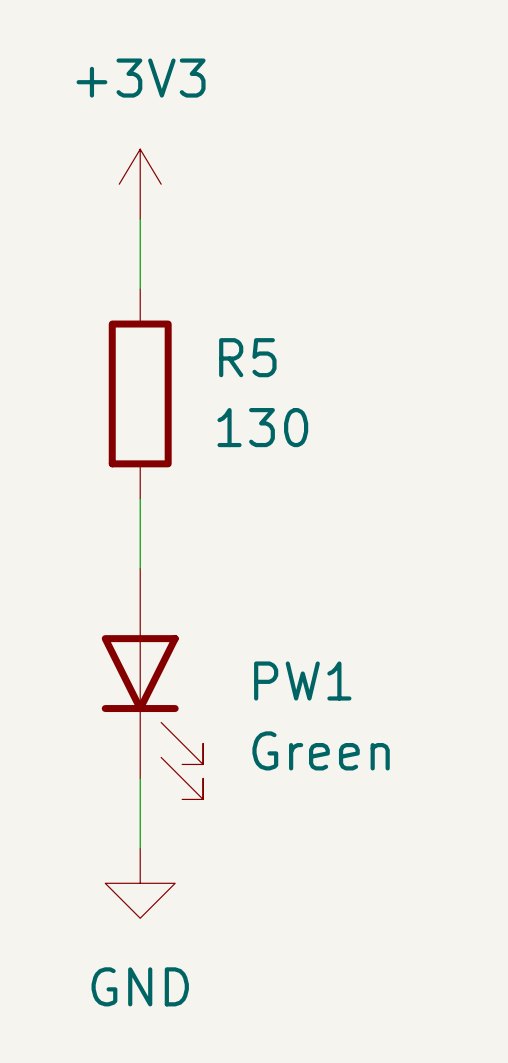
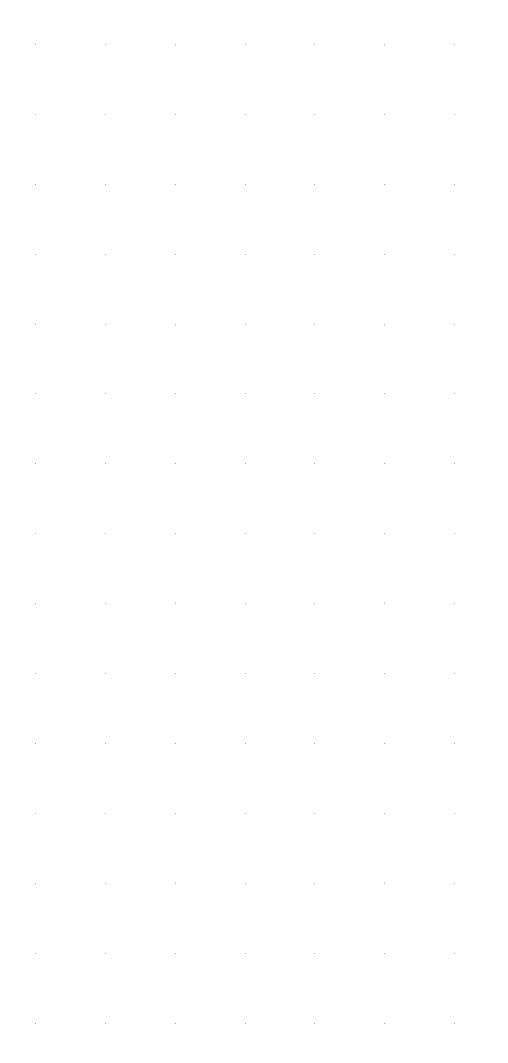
power symbol: +3V3 (140, 184) -> none
wire: (140, 219) (140, 289) -> none
R5: 130 (140, 393) -> none
wire: (140, 498) (140, 568) -> none
PW1: Green (152, 684) -> none
wire: (140, 778) (140, 848) -> none
power symbol: GND (140, 883) -> none

